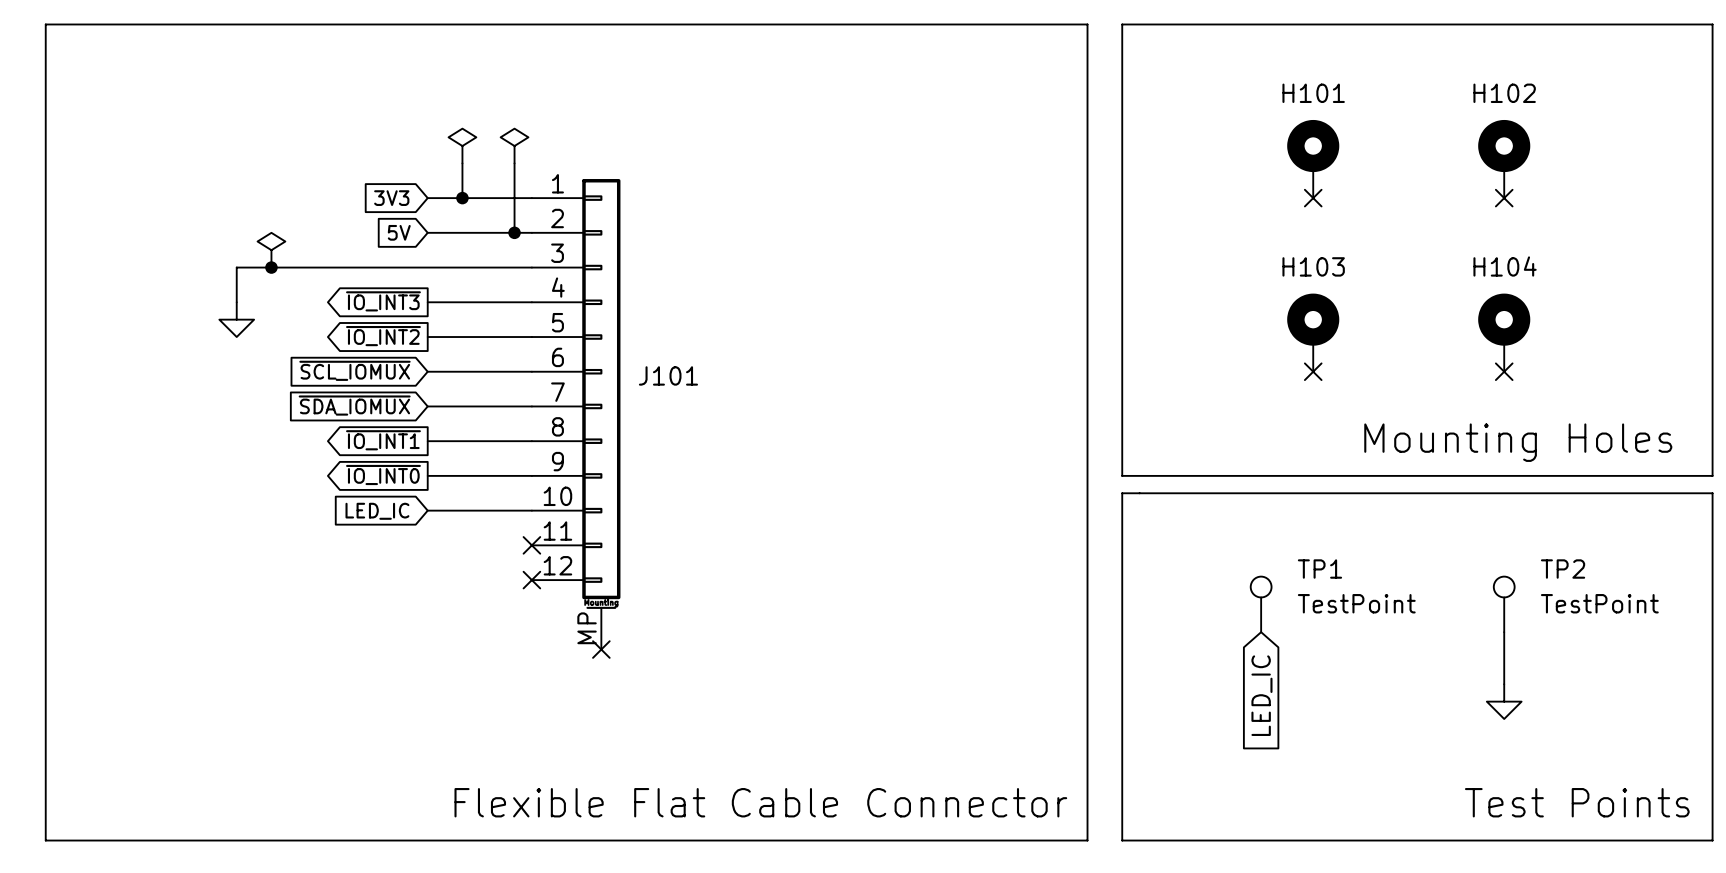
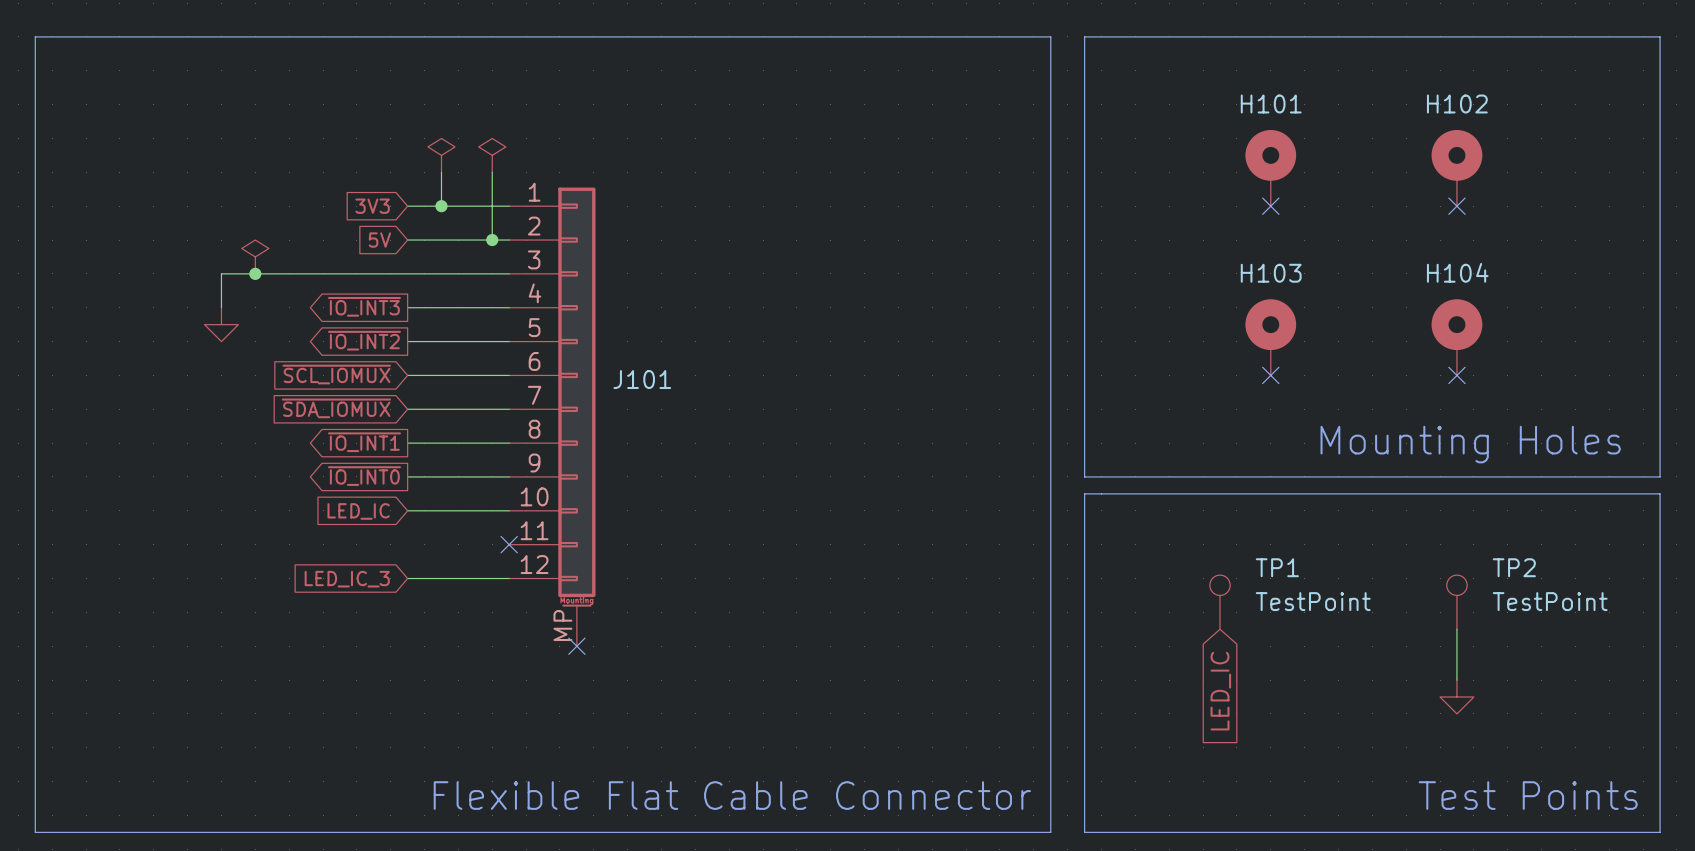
global label: none -> LED_IC_3 (347, 579)
wire: none -> (407, 578) (509, 578)
no-connect mark: (531, 580) -> none

